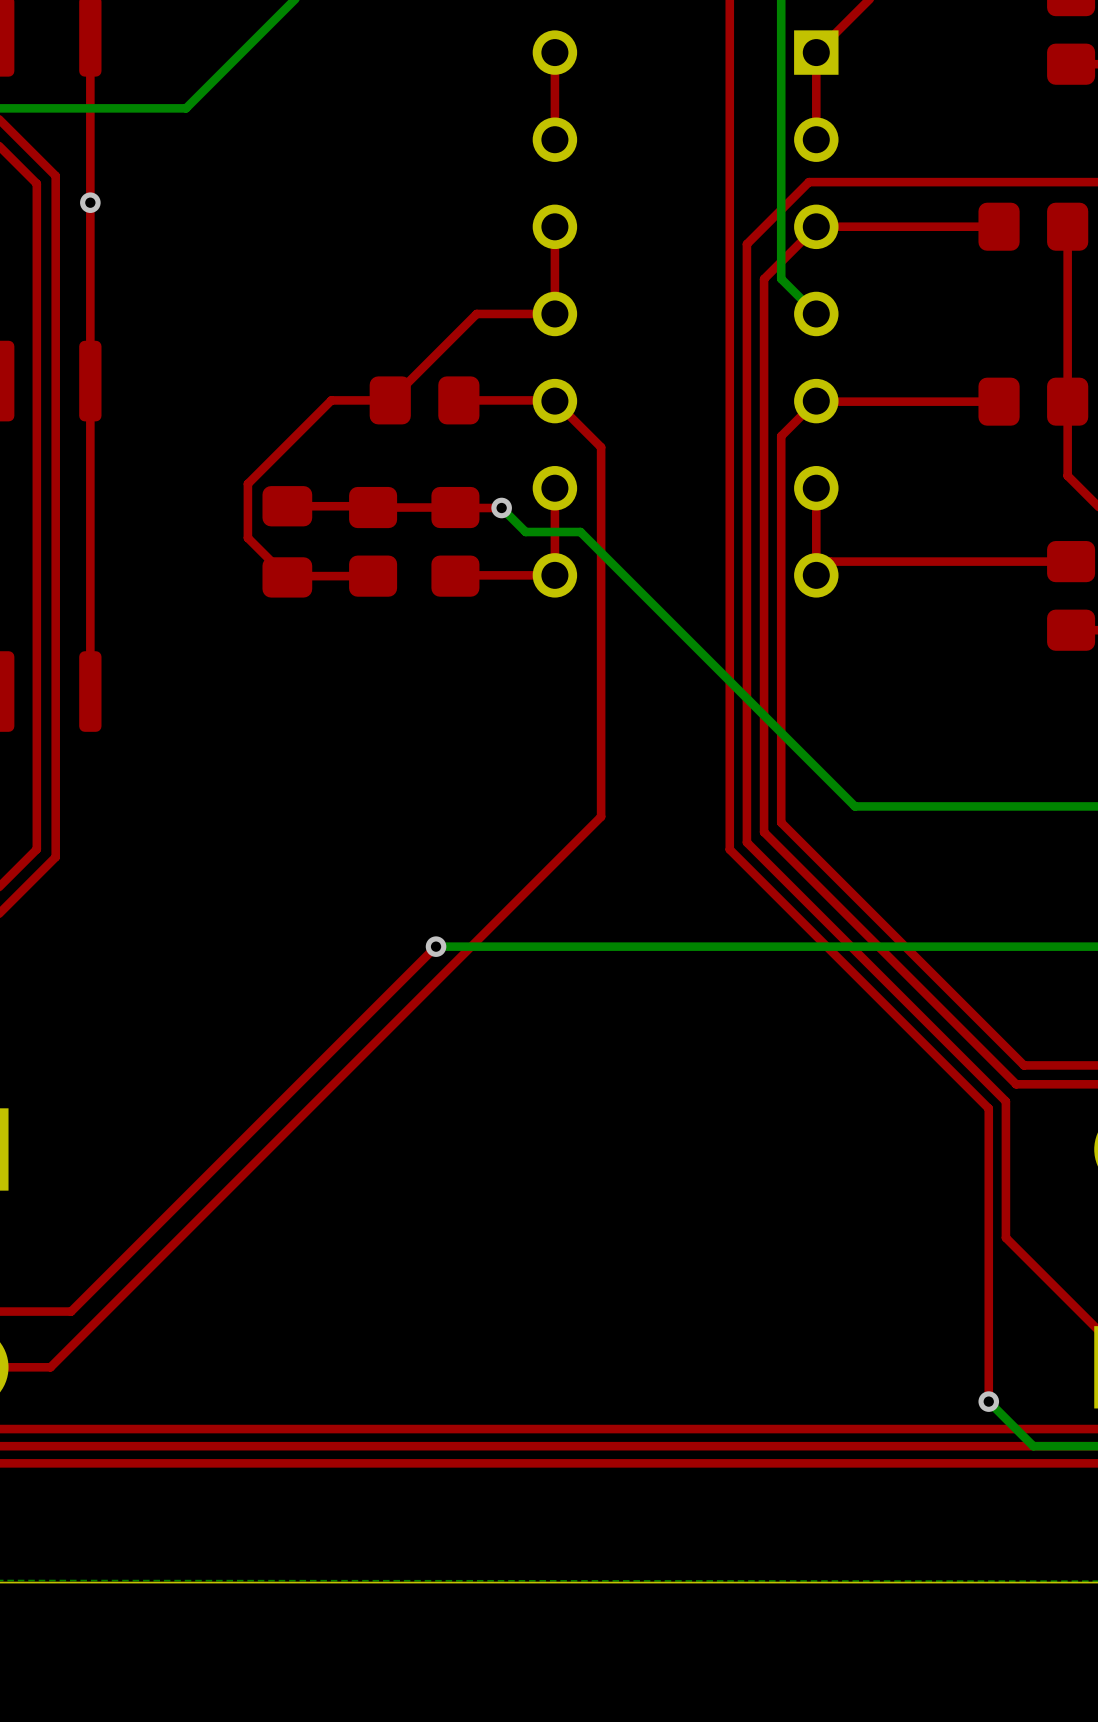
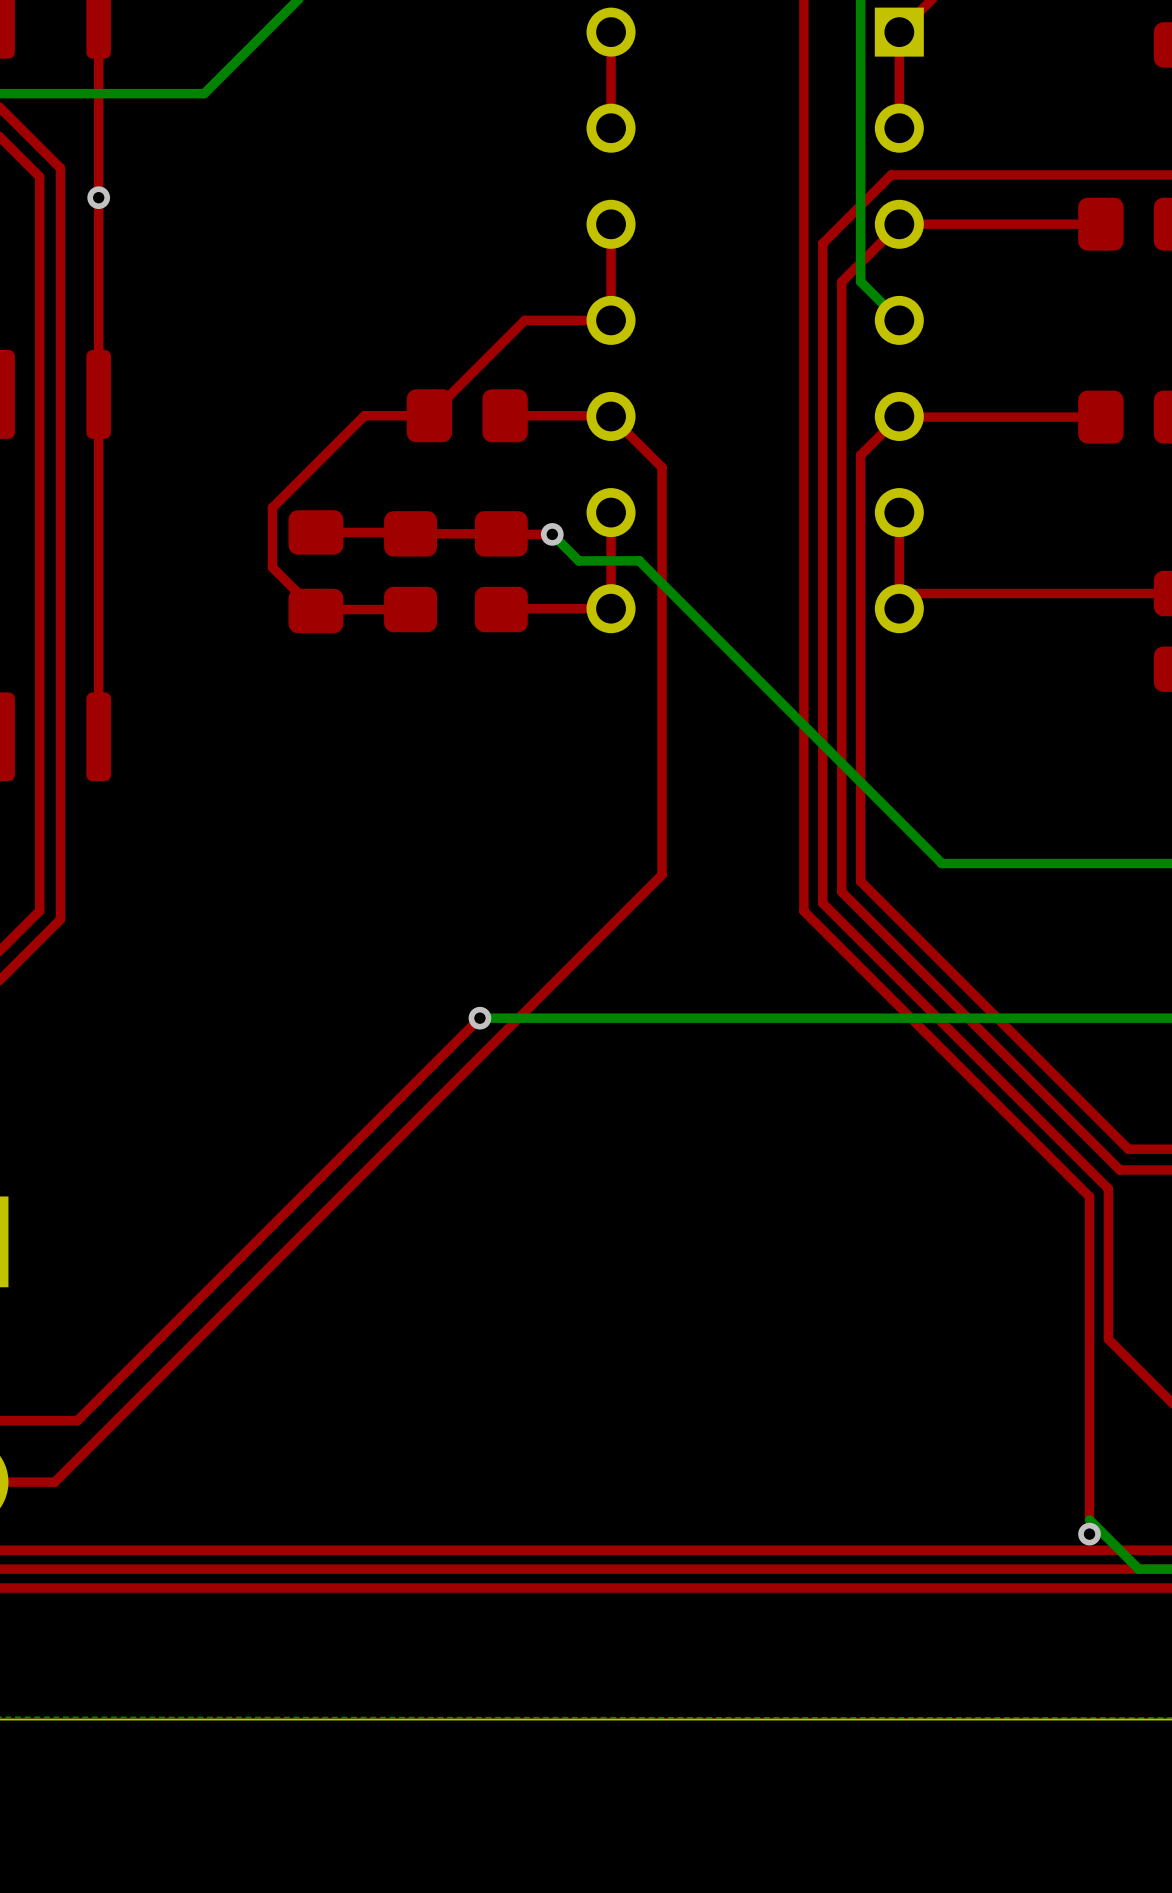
via position: (988, 1401) -> (1089, 1534)

